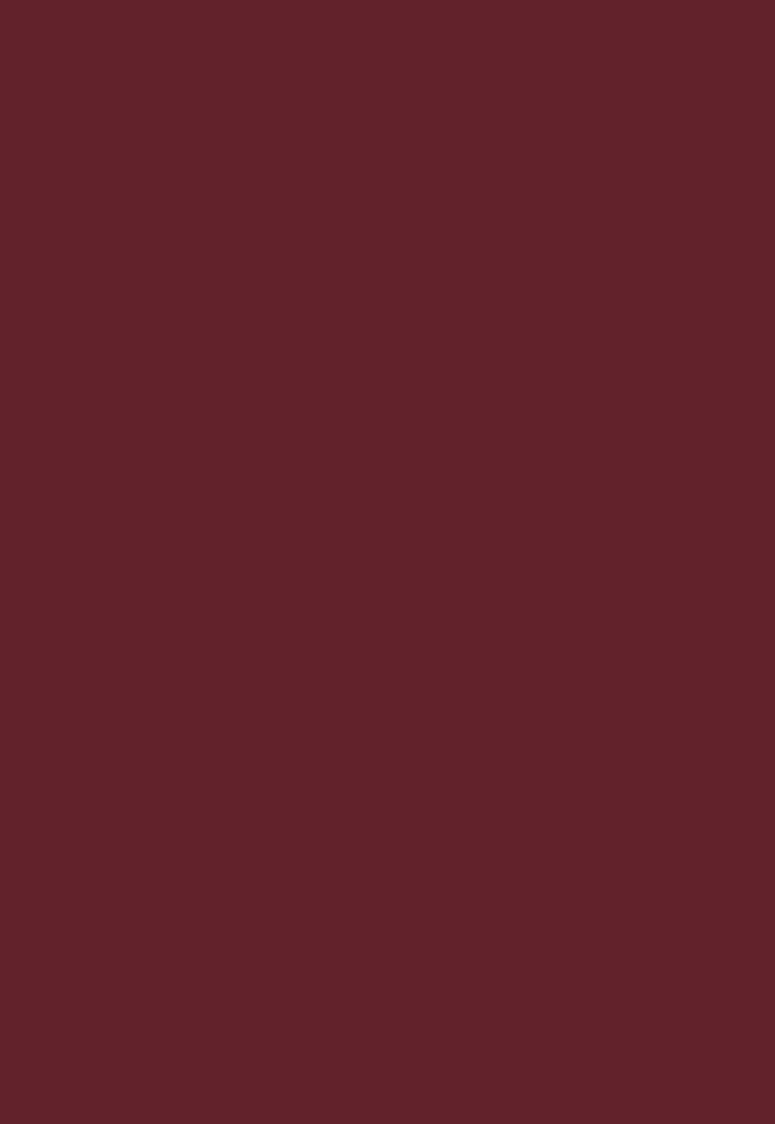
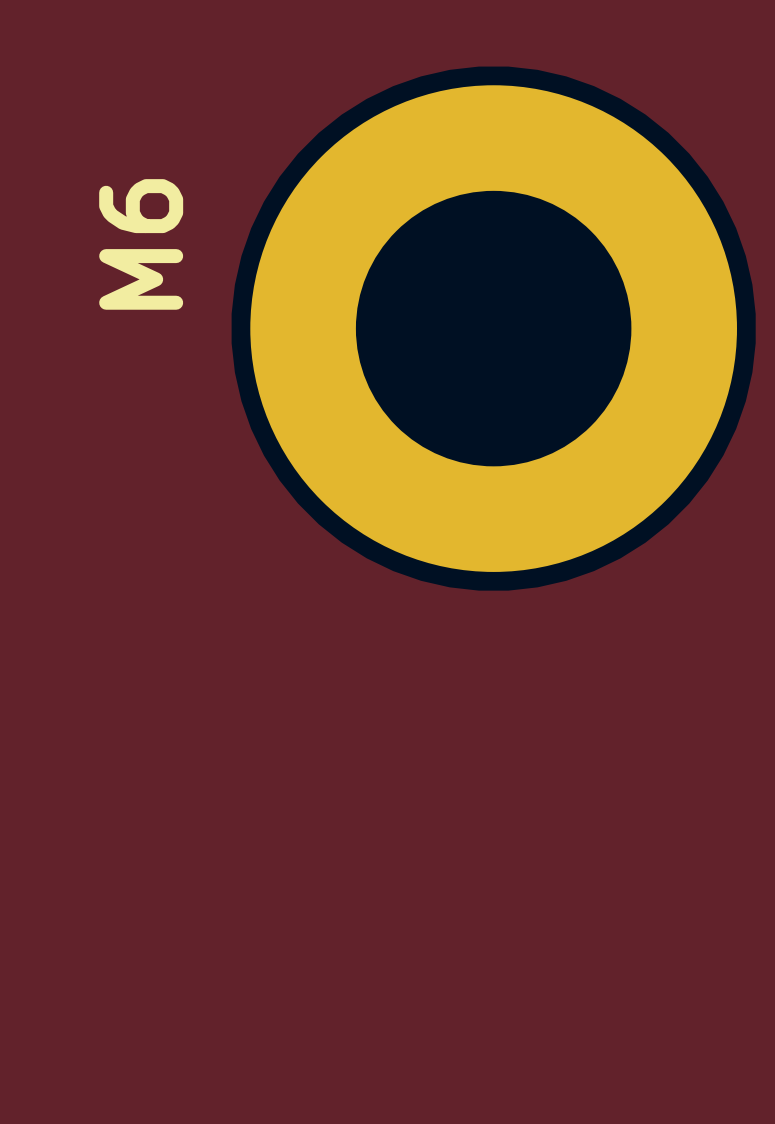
M6: none -> (493, 328)

